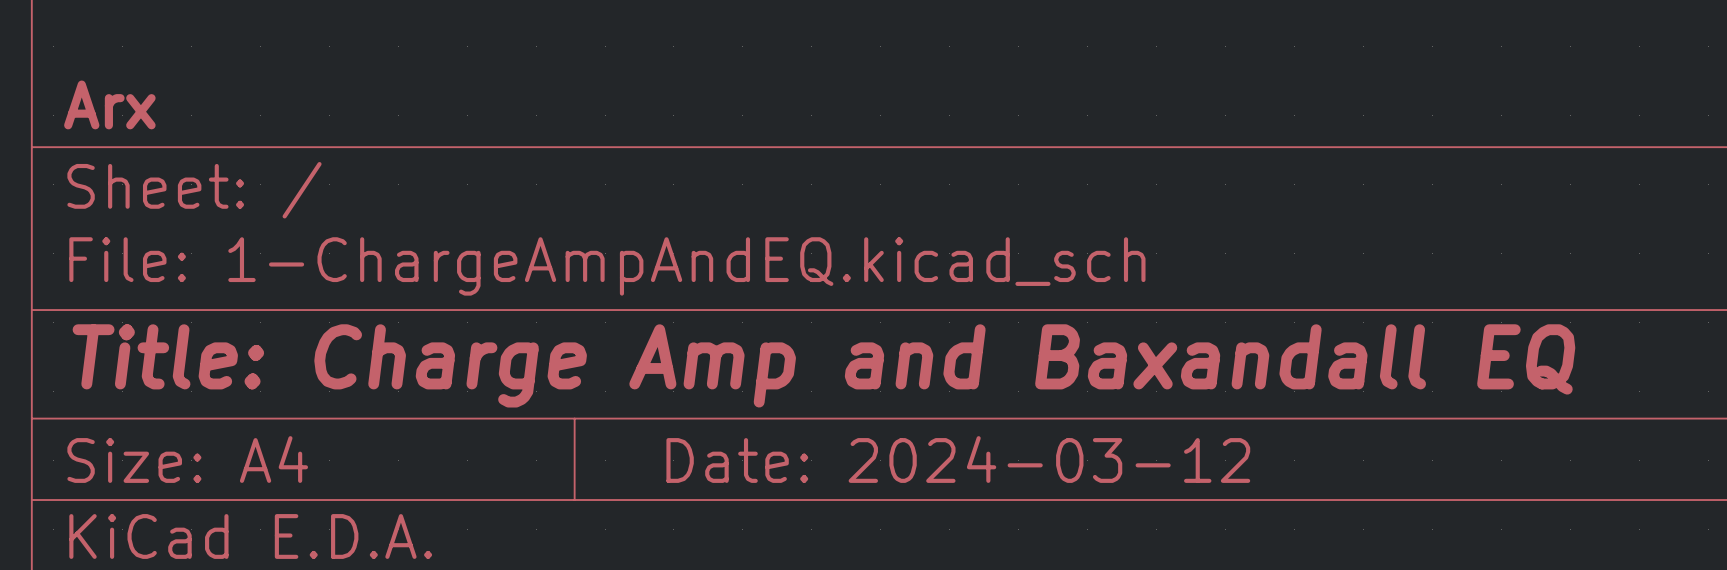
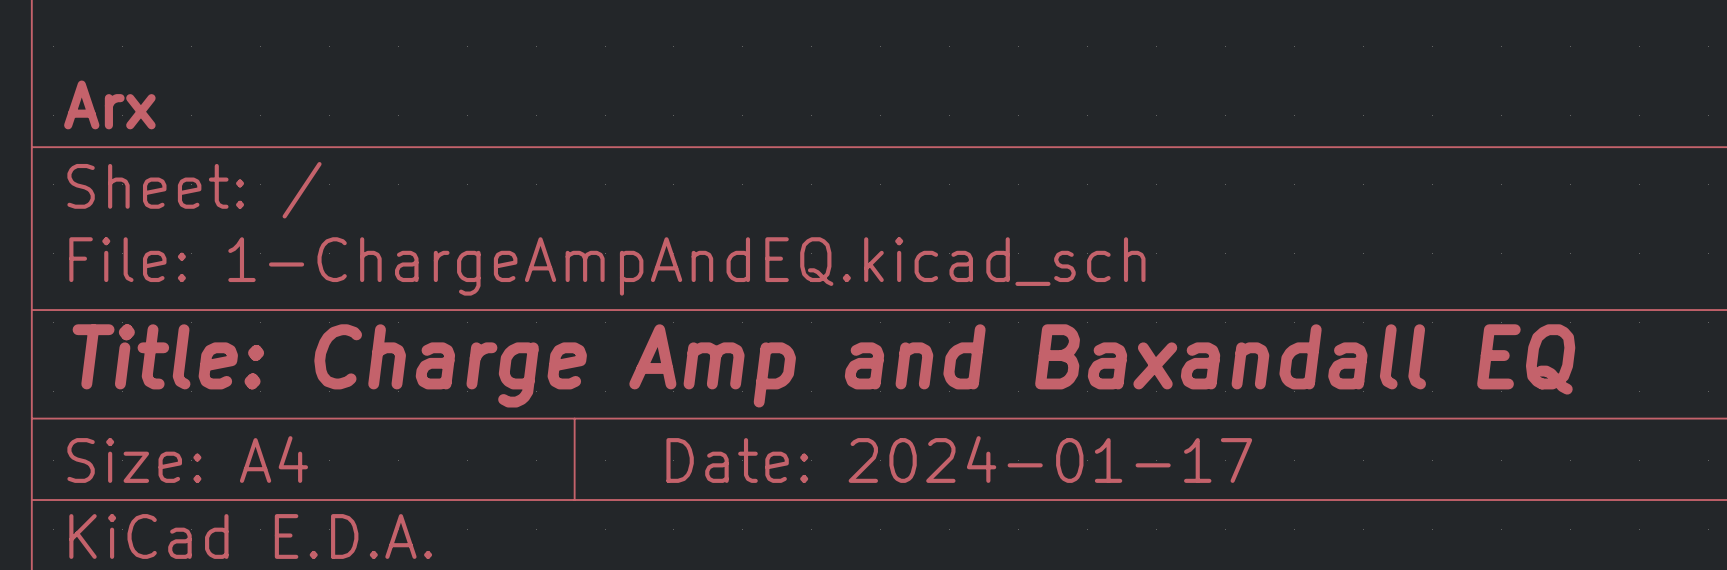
title block: Date: 2024-03-12 (958, 459) -> Date: 2024-01-17 (959, 459)

